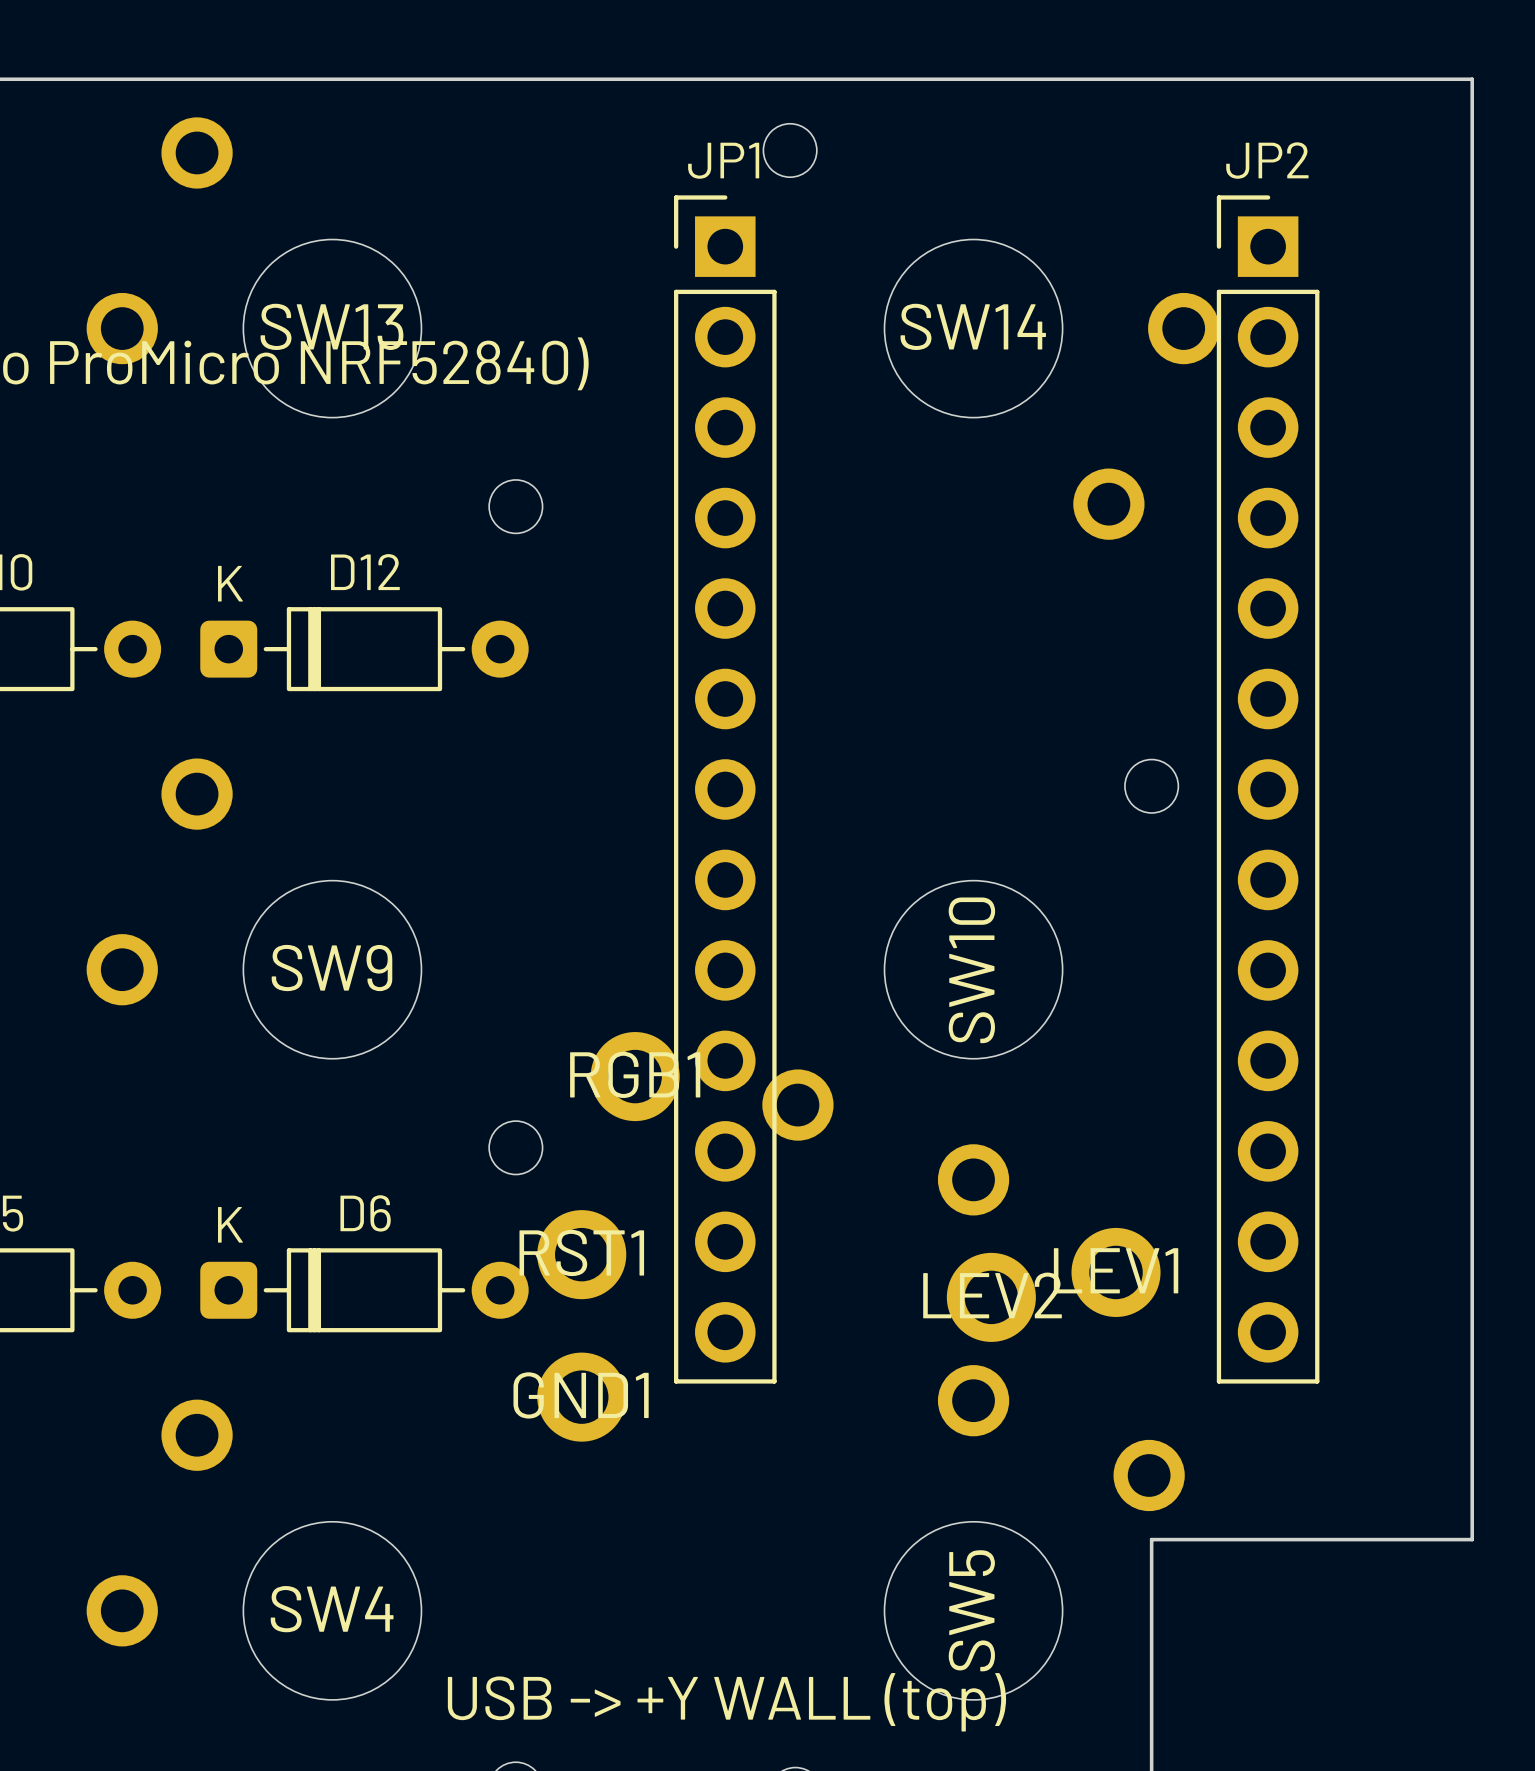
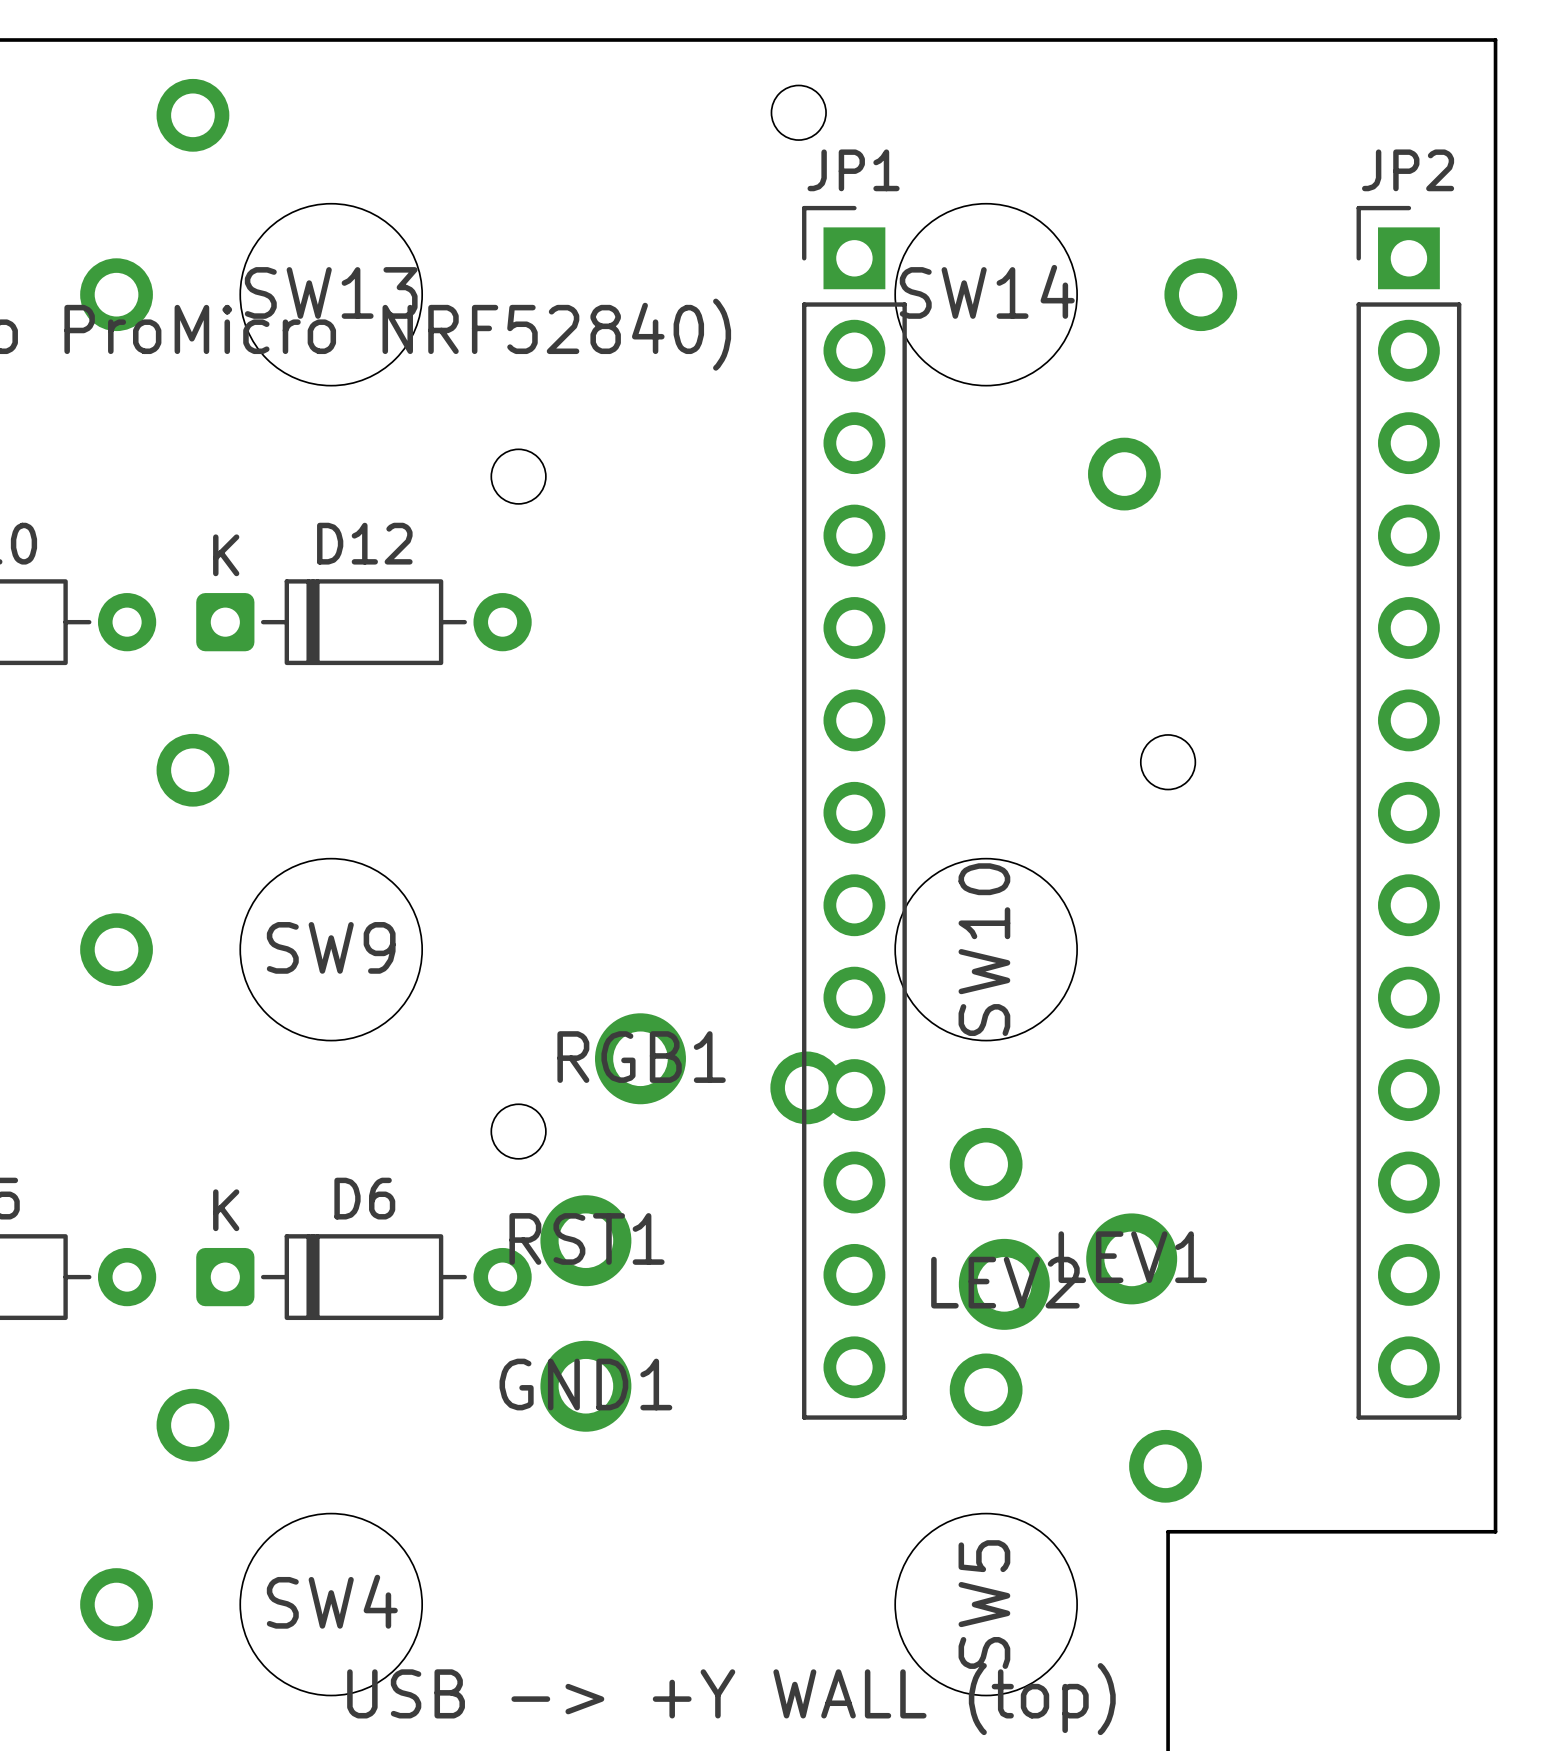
JP1 position: (725, 789) -> (854, 812)
JP2 position: (1268, 789) -> (1408, 812)

